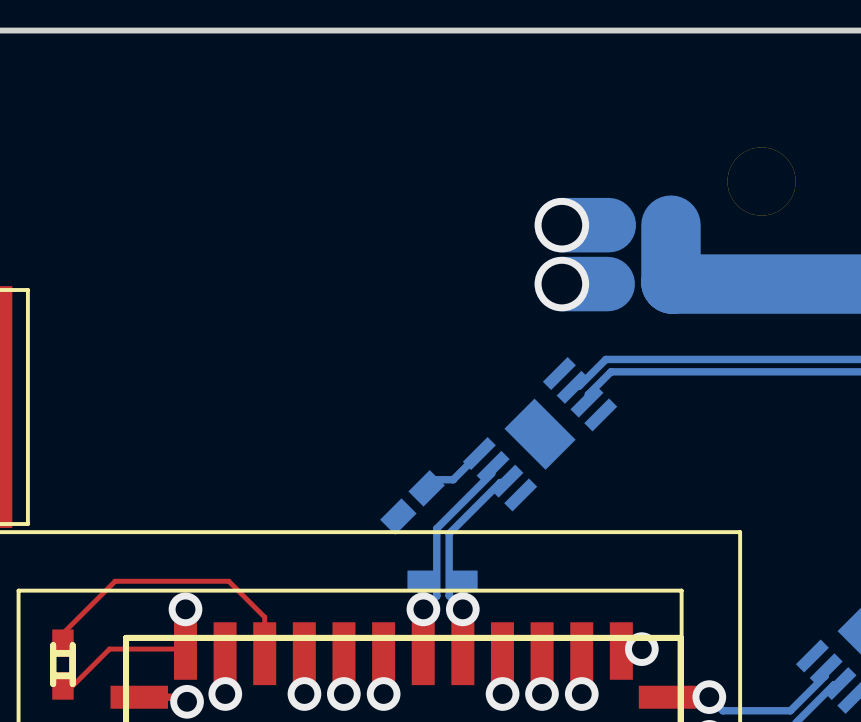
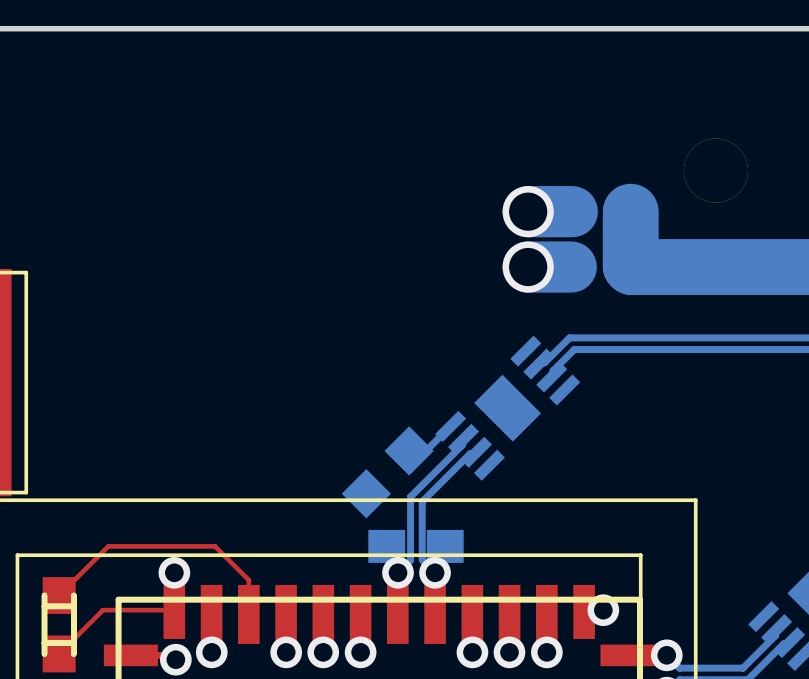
part footprint: [380, 470, 445, 535] -> [341, 426, 434, 519]
part footprint: [407, 570, 478, 593] -> [368, 529, 464, 563]
part footprint: [50, 629, 76, 700] -> [41, 577, 77, 673]

